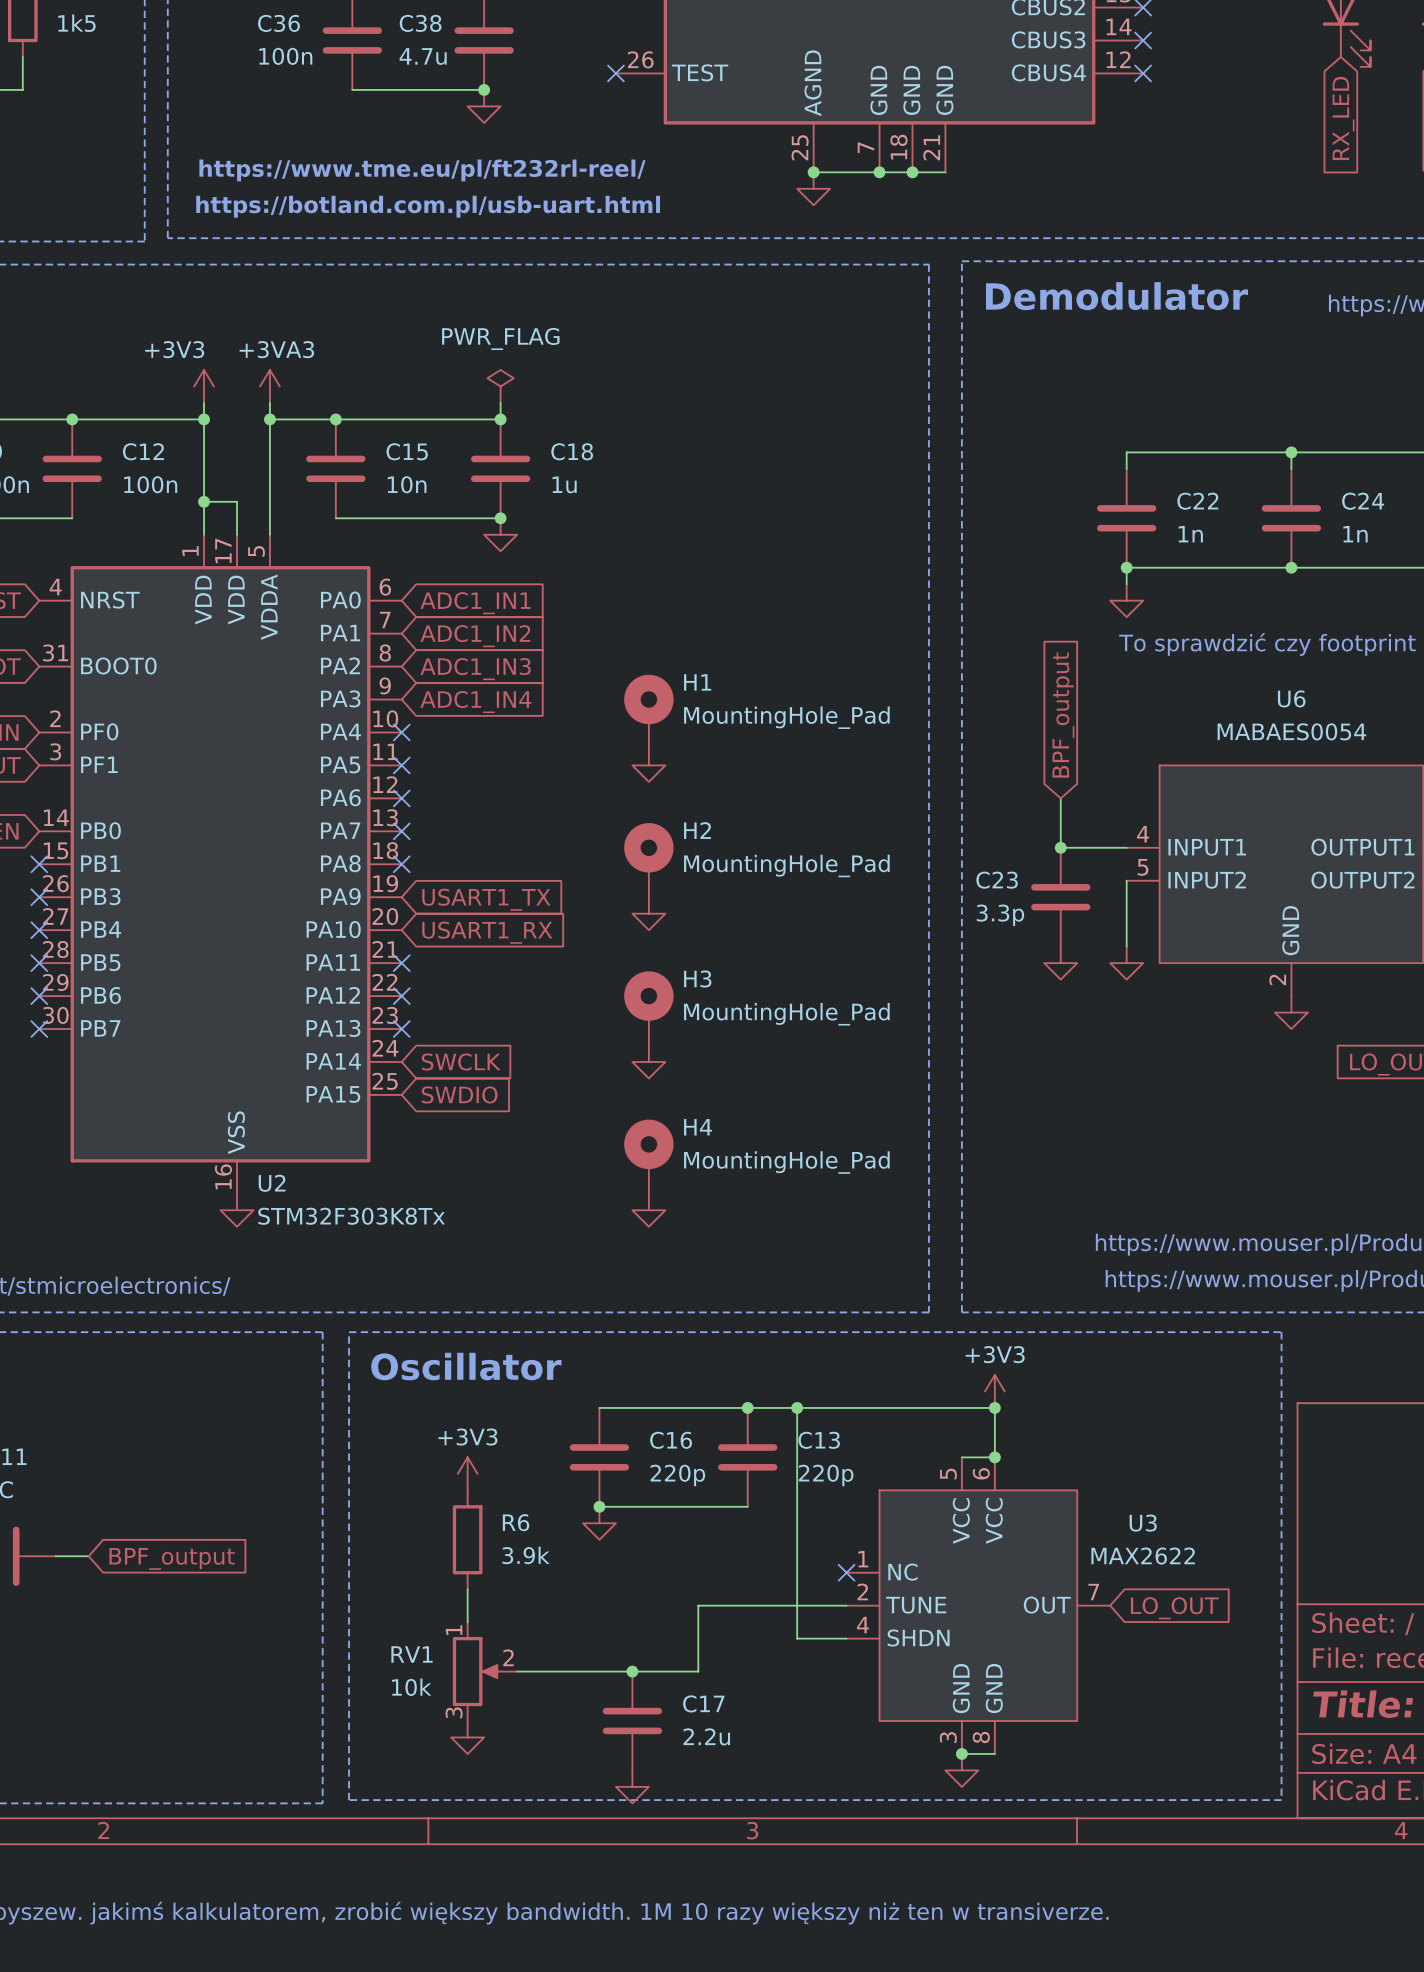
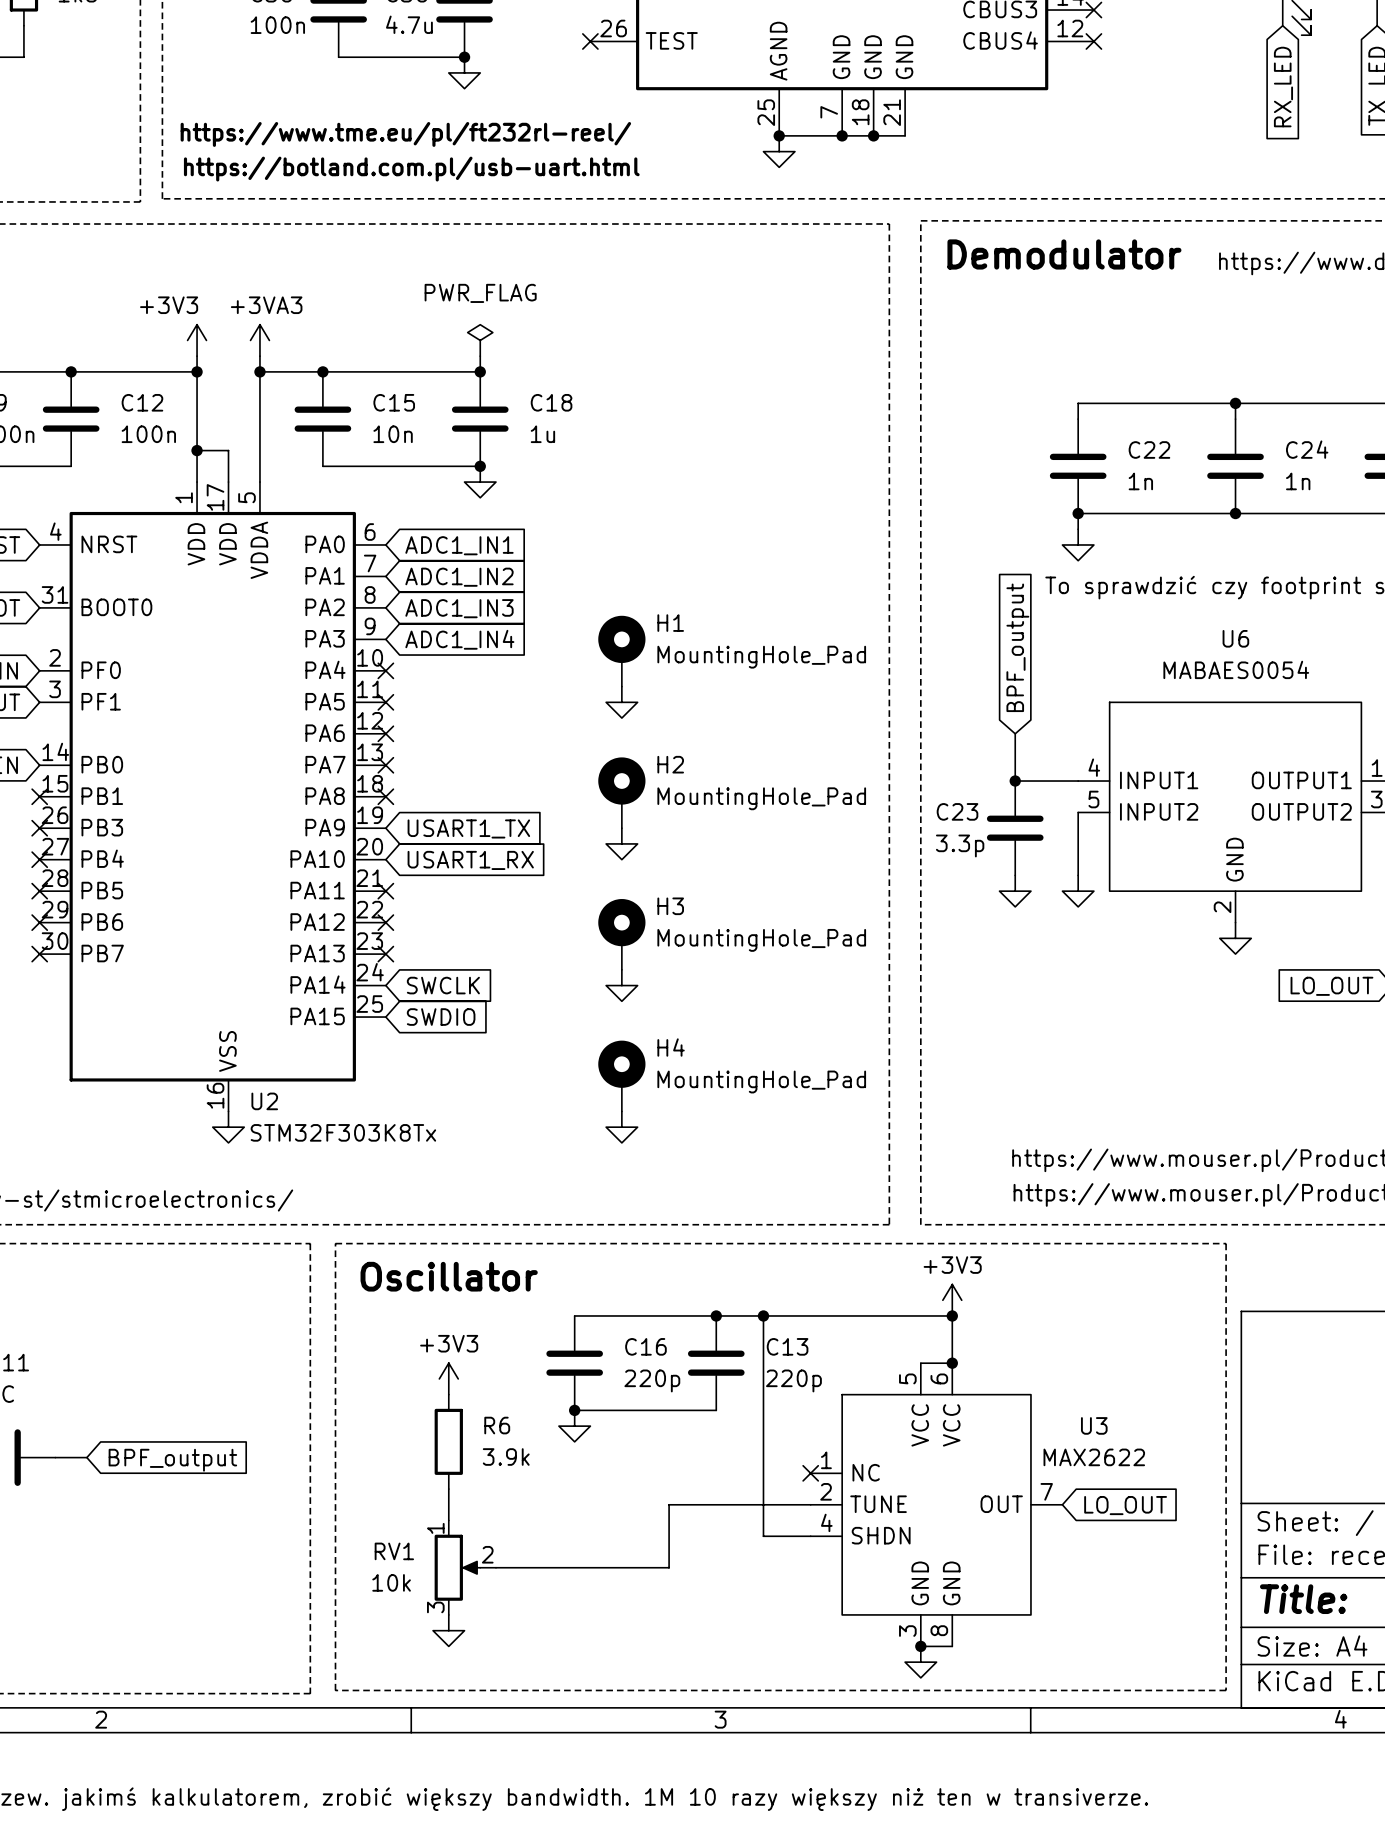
junction: (632, 1671) -> none
C17: 2.2u (632, 1721) -> none
power symbol: (632, 1786) -> none

